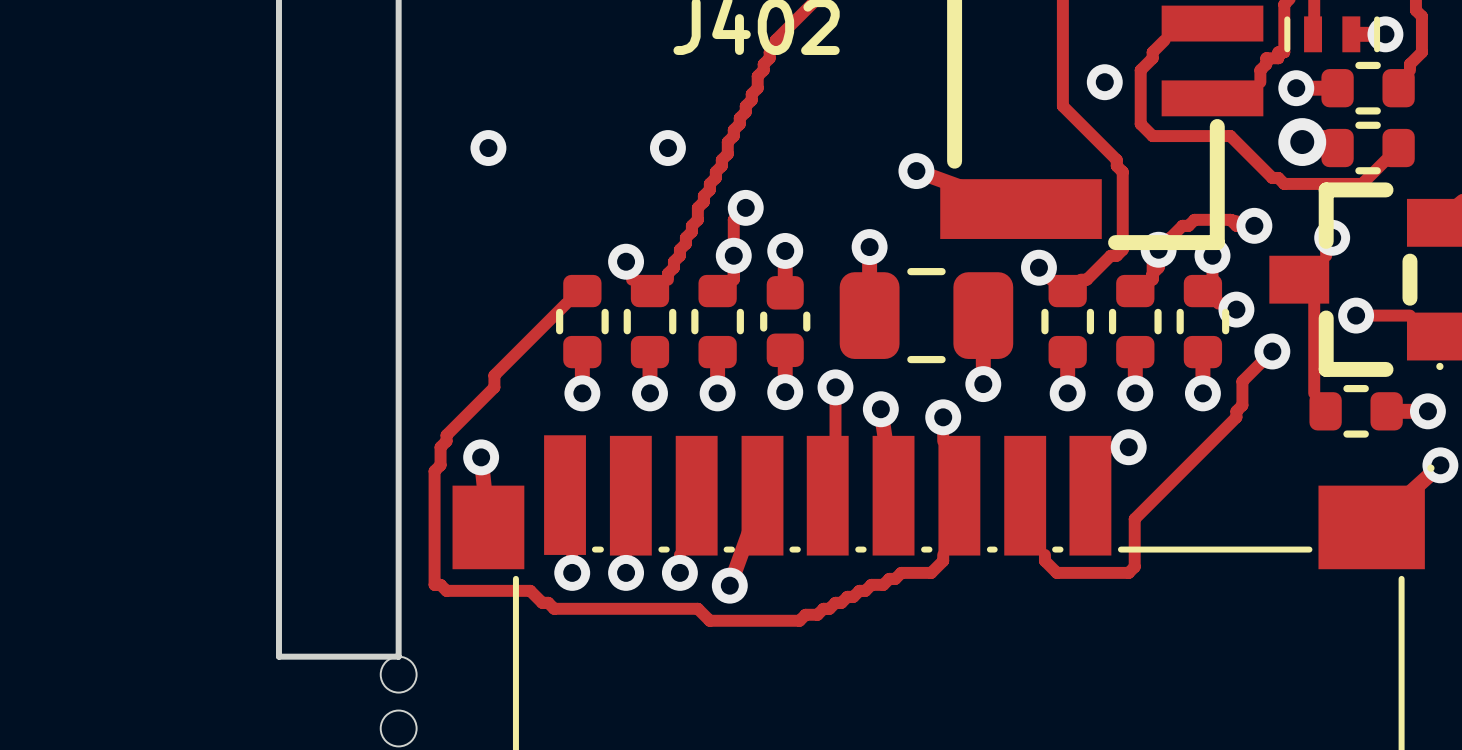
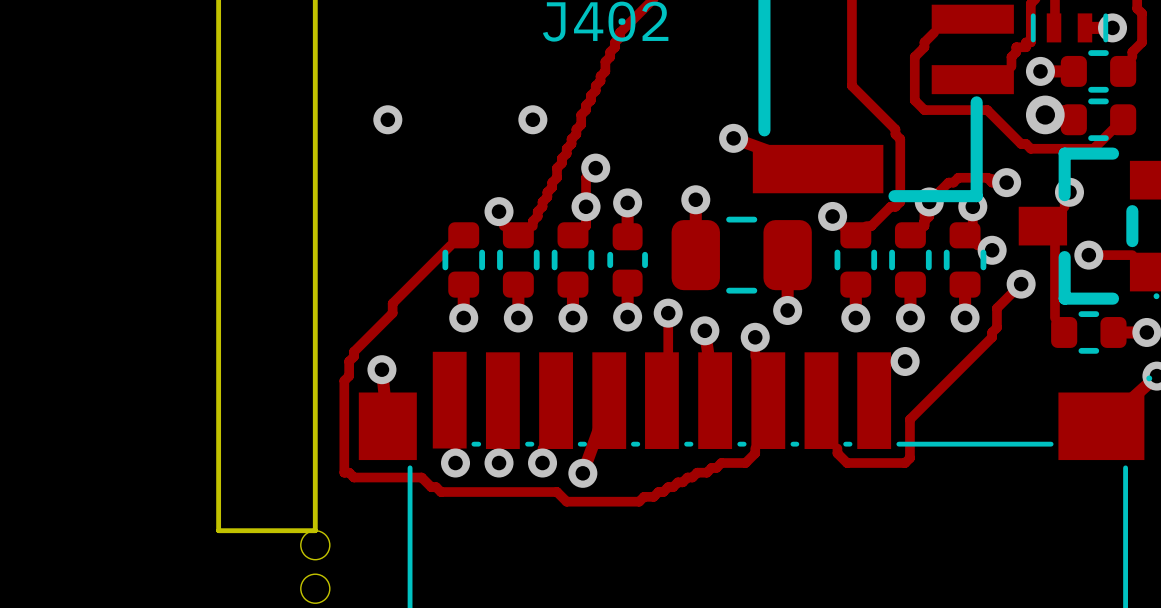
via: (1104, 82) -> none

